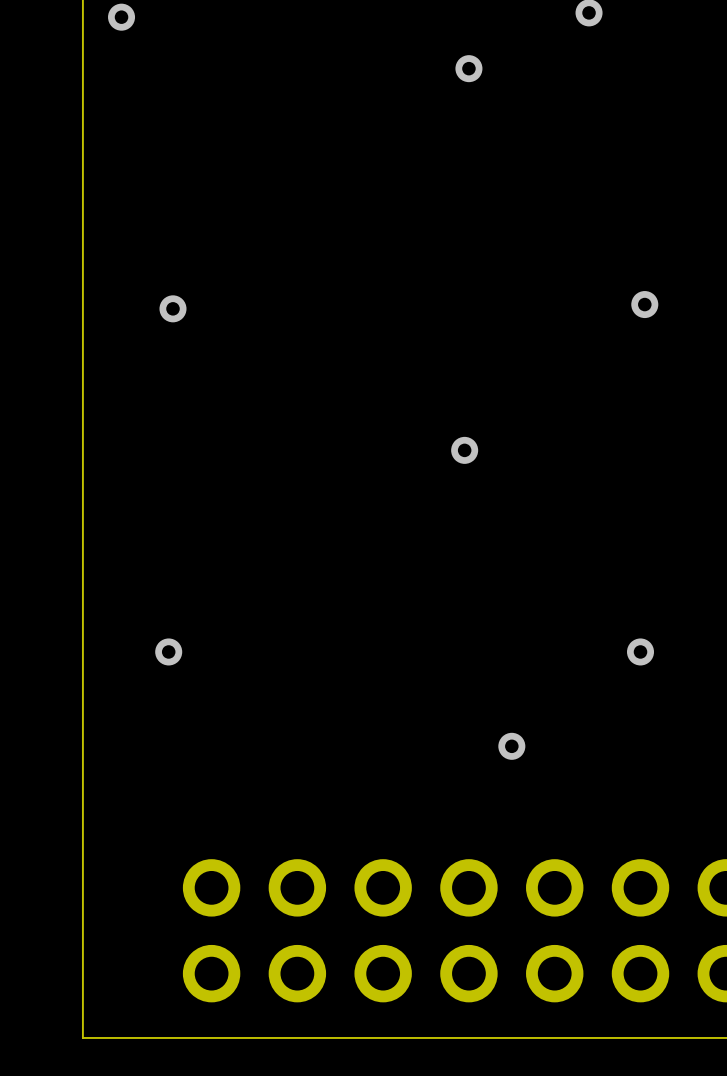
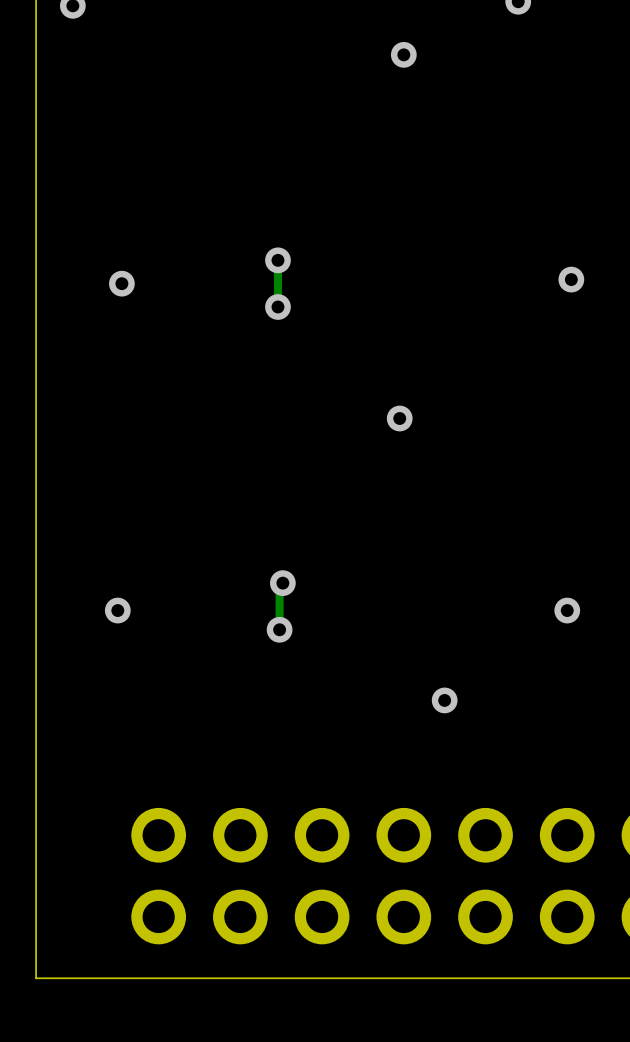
track: none -> (277, 260) (277, 307)
via: none -> (277, 260)
via: none -> (277, 307)
track: none -> (282, 583) (279, 586) (279, 629)
via: none -> (282, 583)
via: none -> (279, 629)

